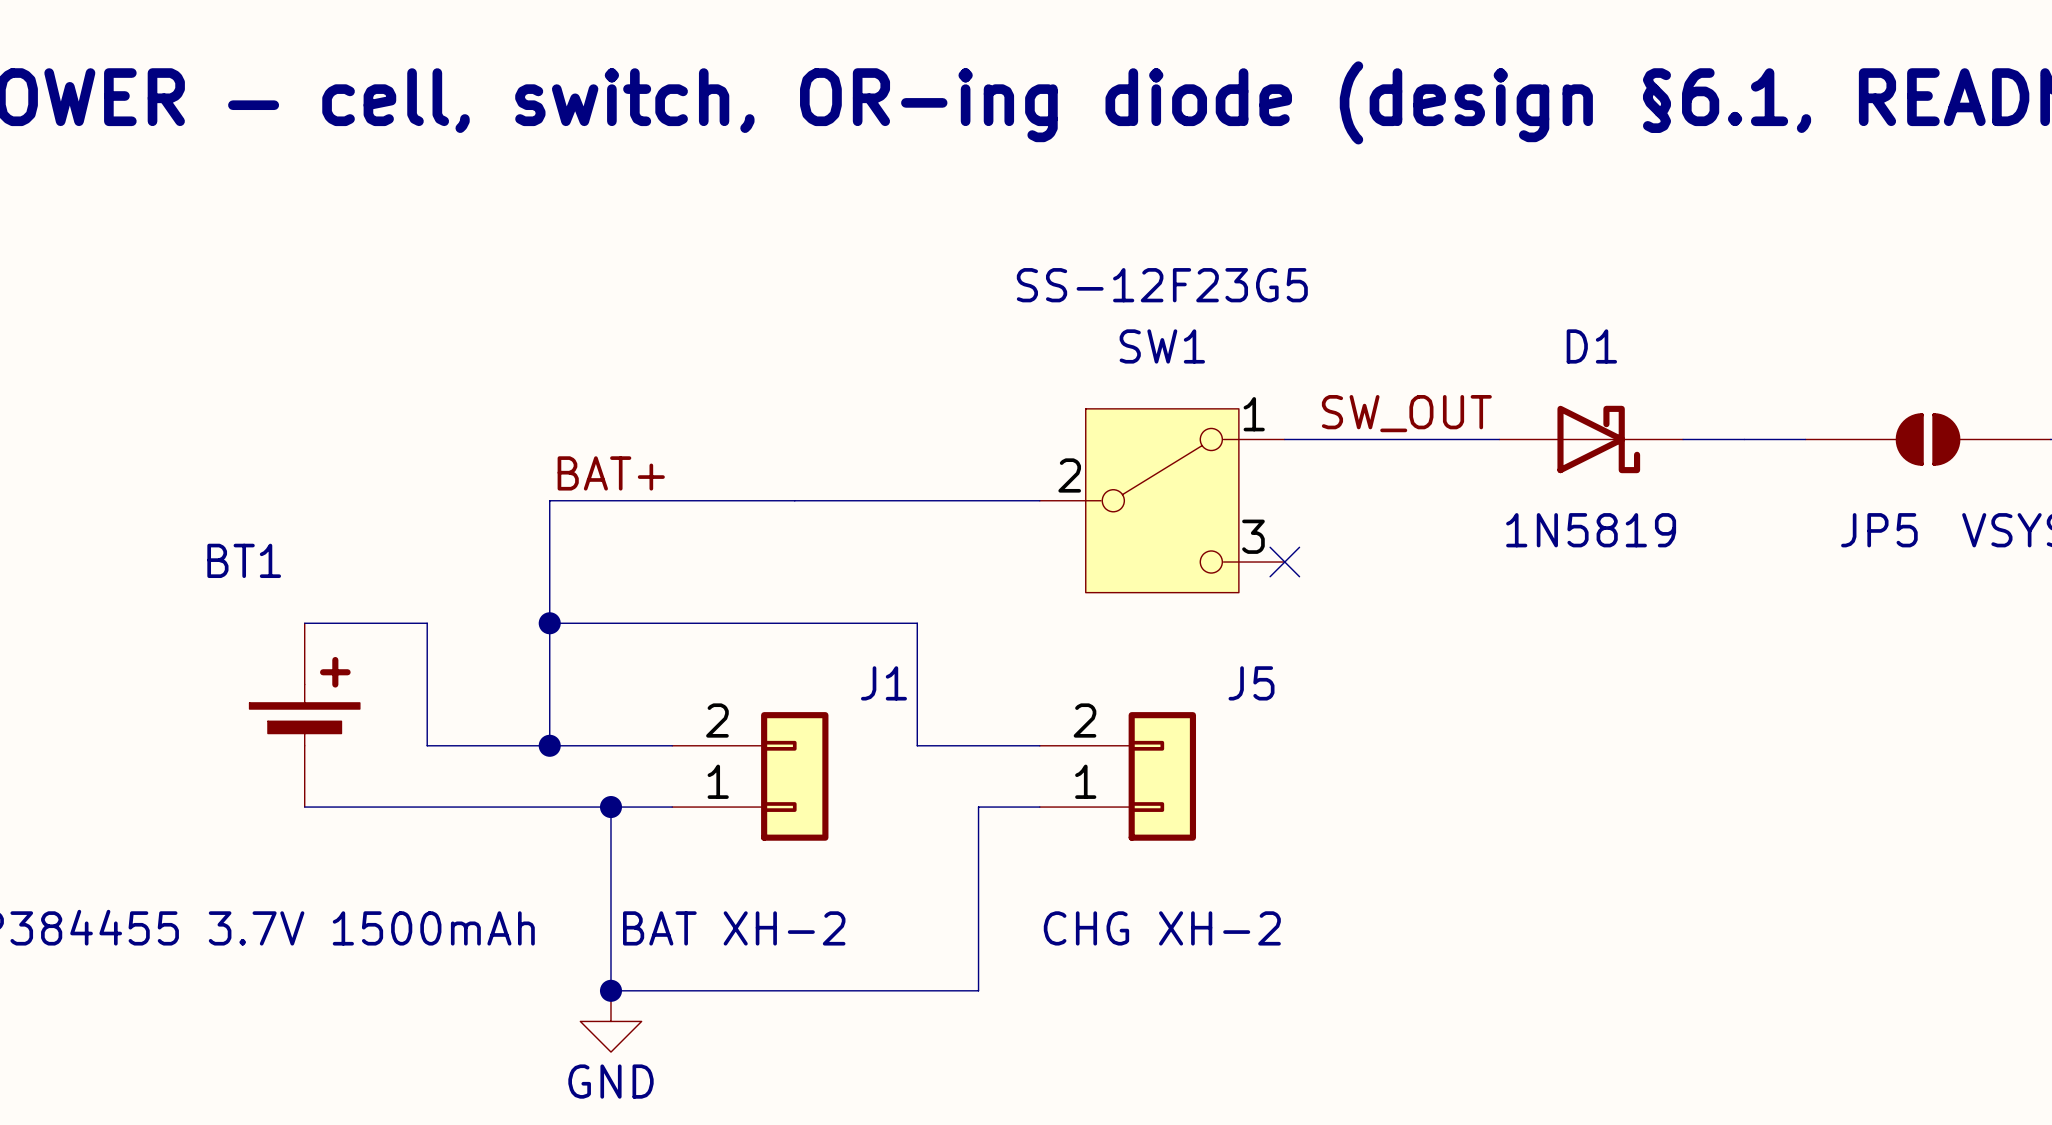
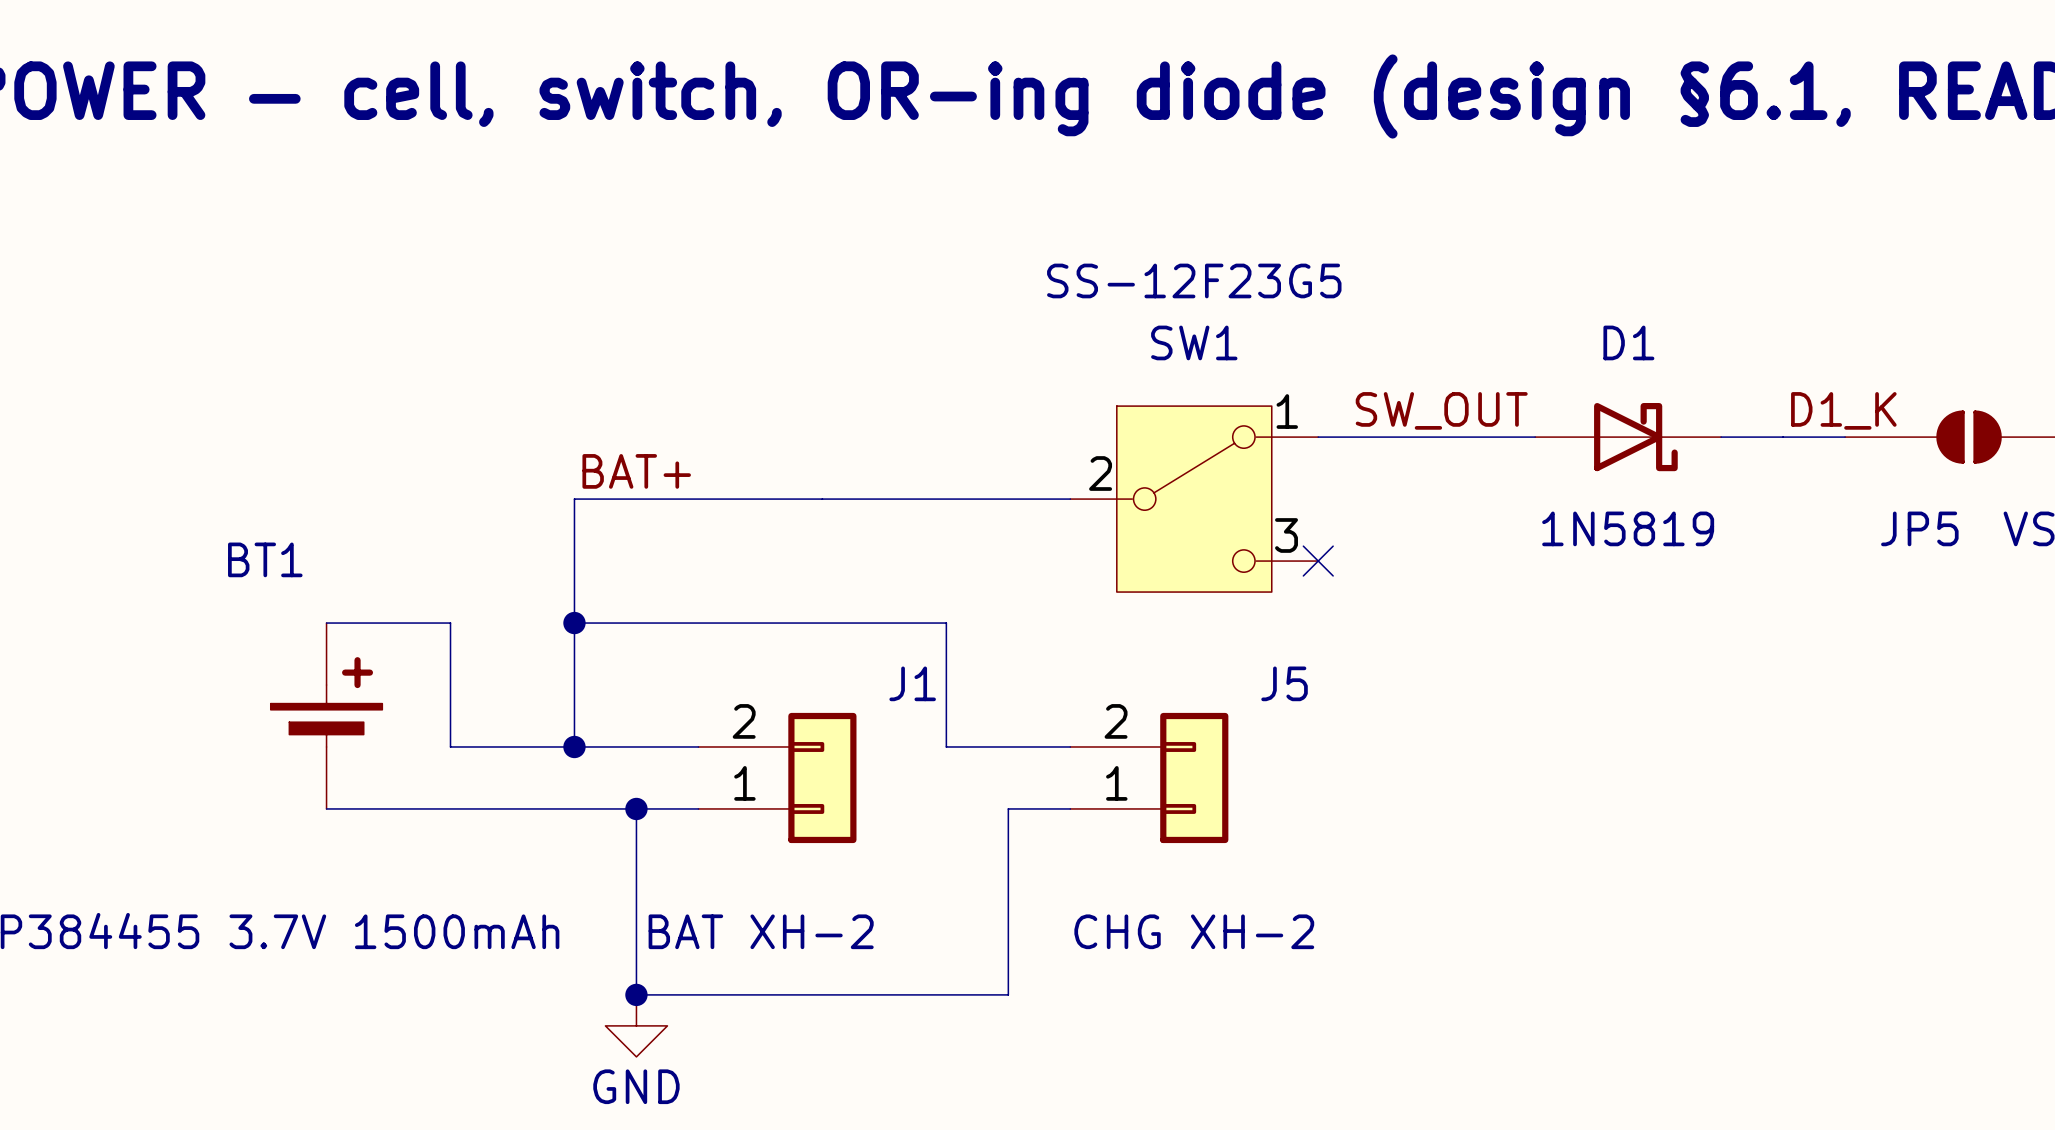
label: none -> D1_K (1843, 410)

